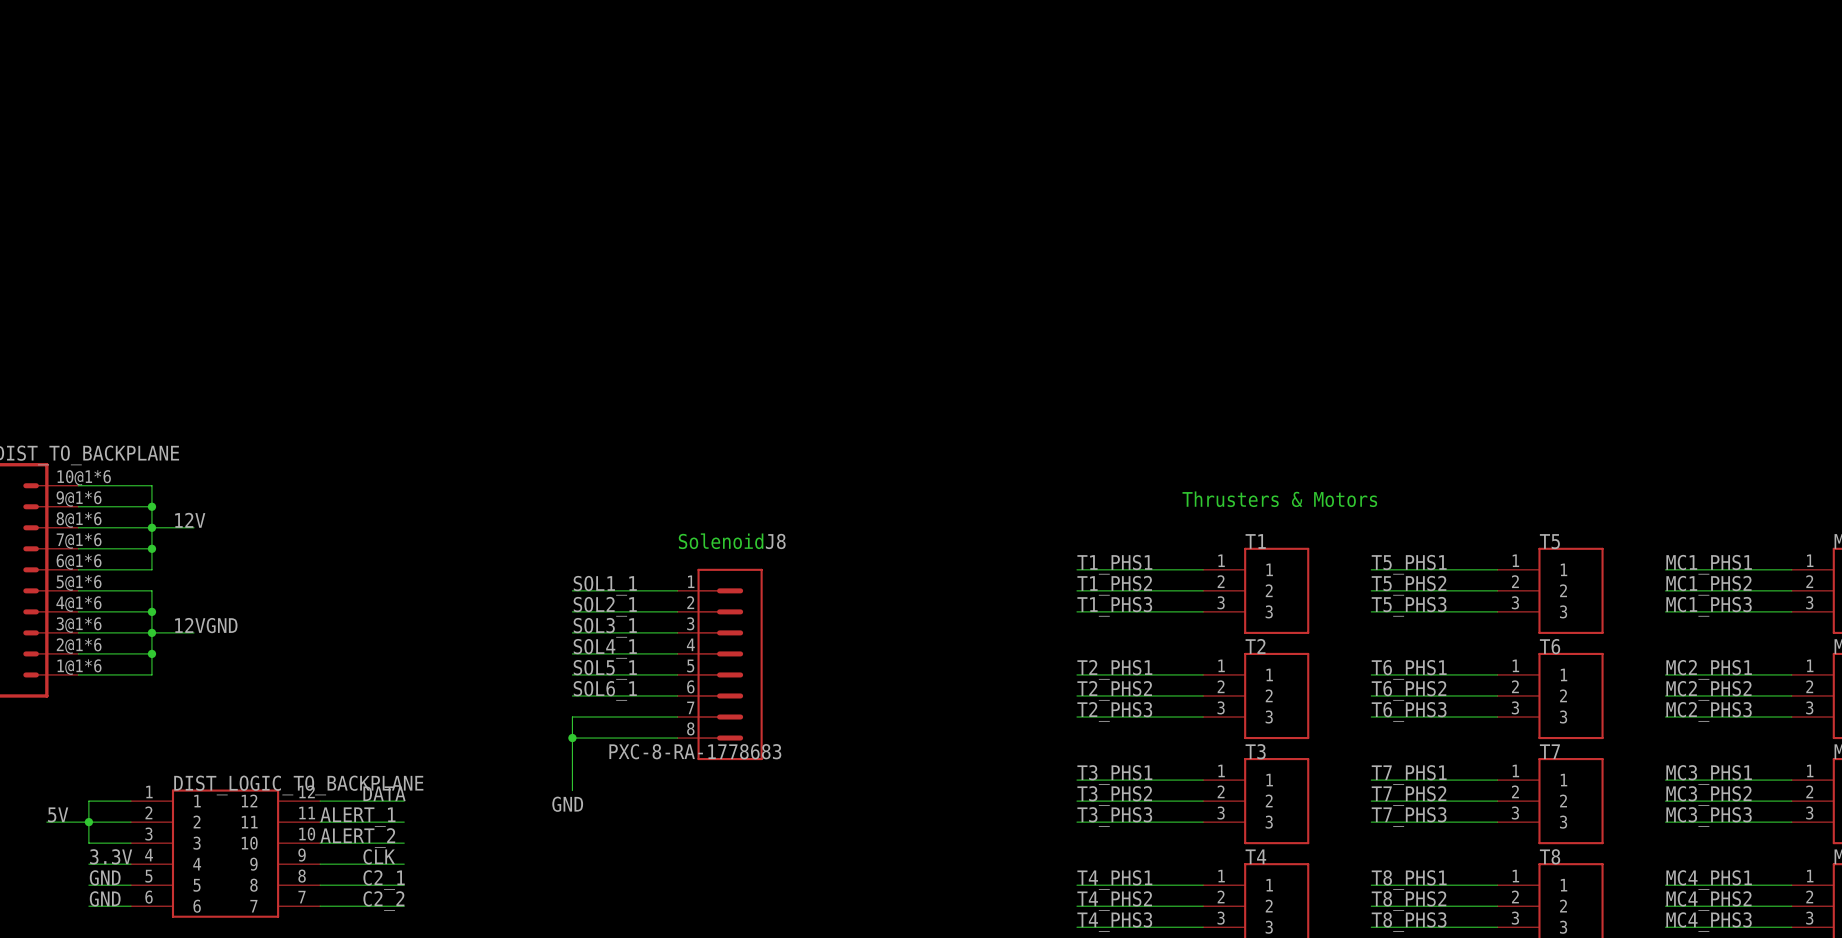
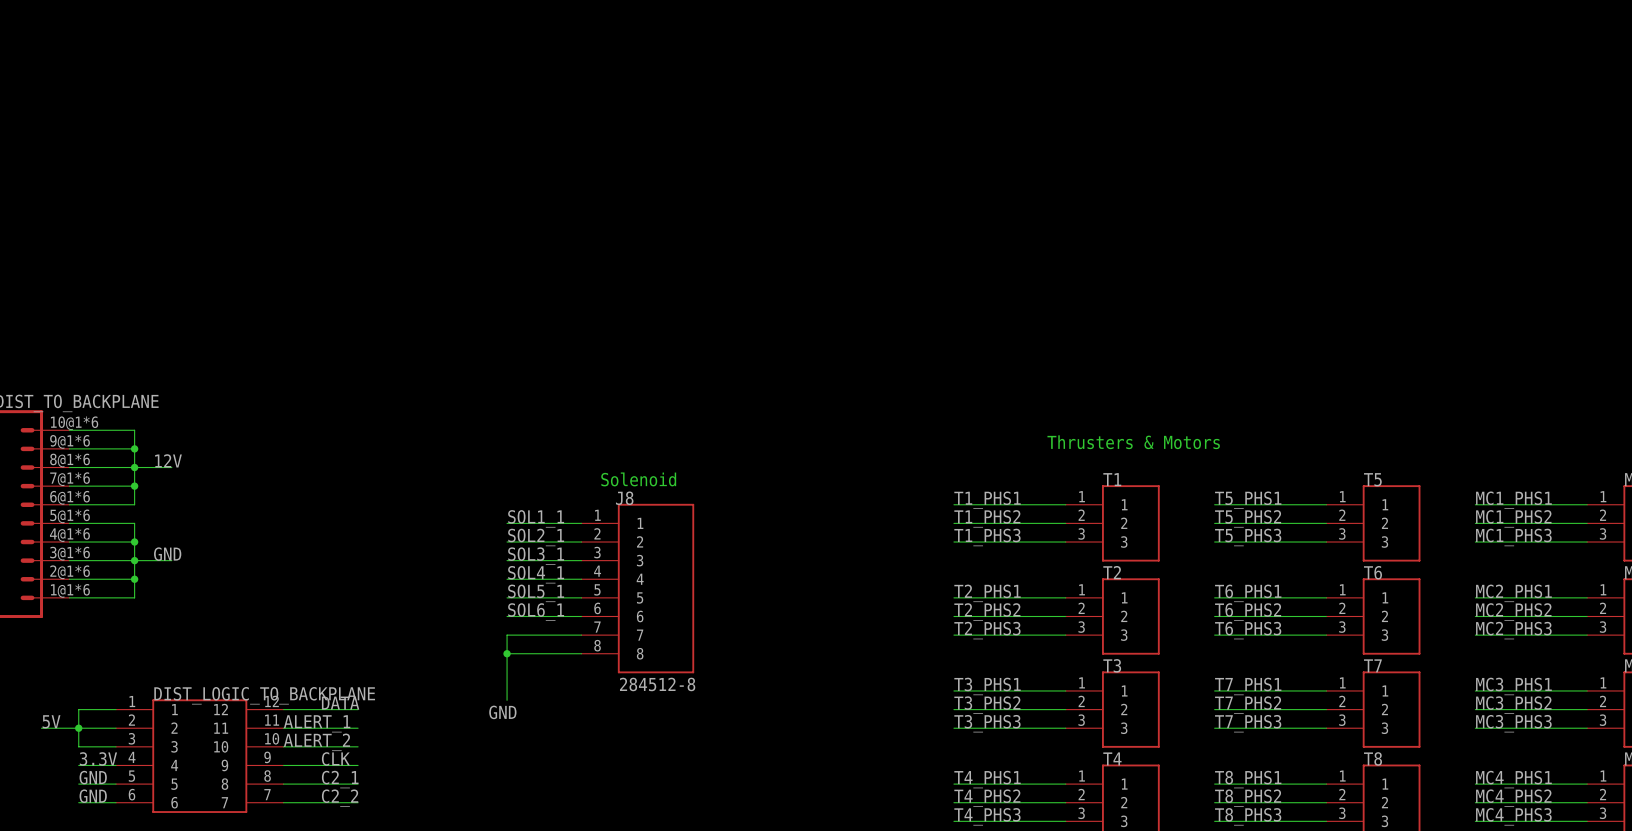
J8 name position: J8 (775, 541) -> J8 (624, 498)
J8 symbol: [677, 568, 763, 761] -> [581, 503, 695, 674]
label: 12VGND (206, 625) -> GND (167, 554)
J8 value: PXC-8-RA-1778683 (695, 751) -> 284512-8 (657, 684)

